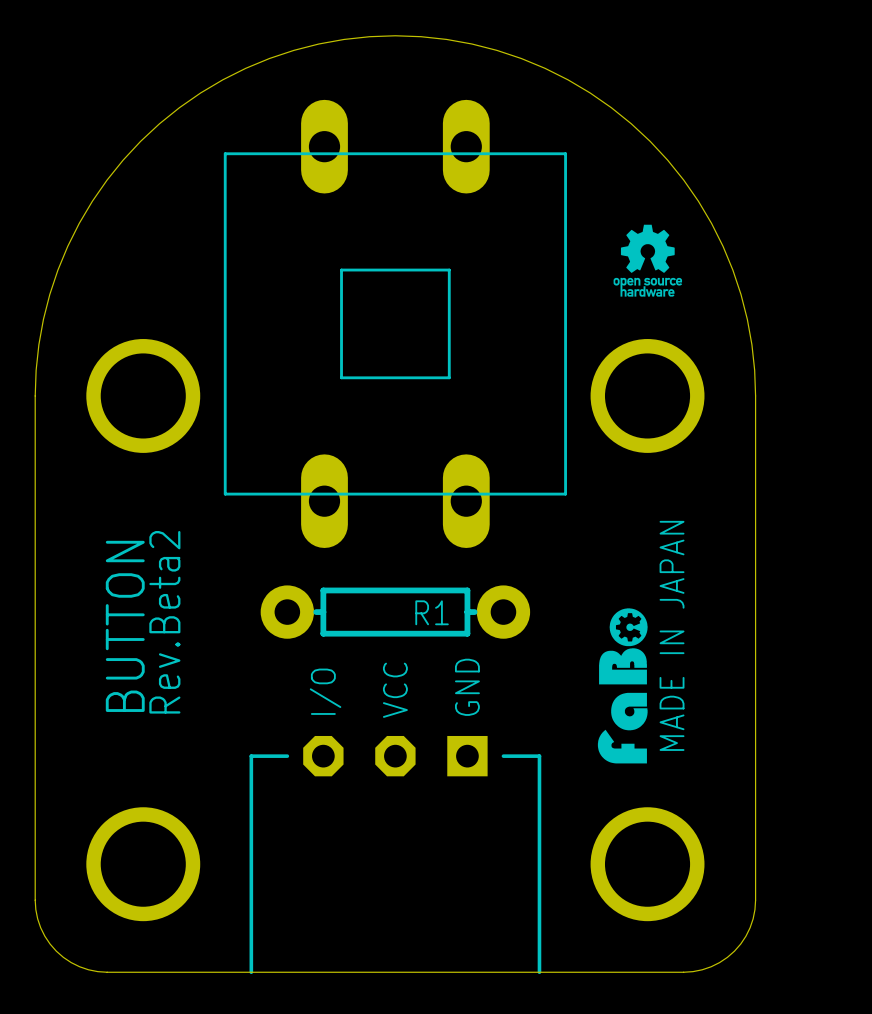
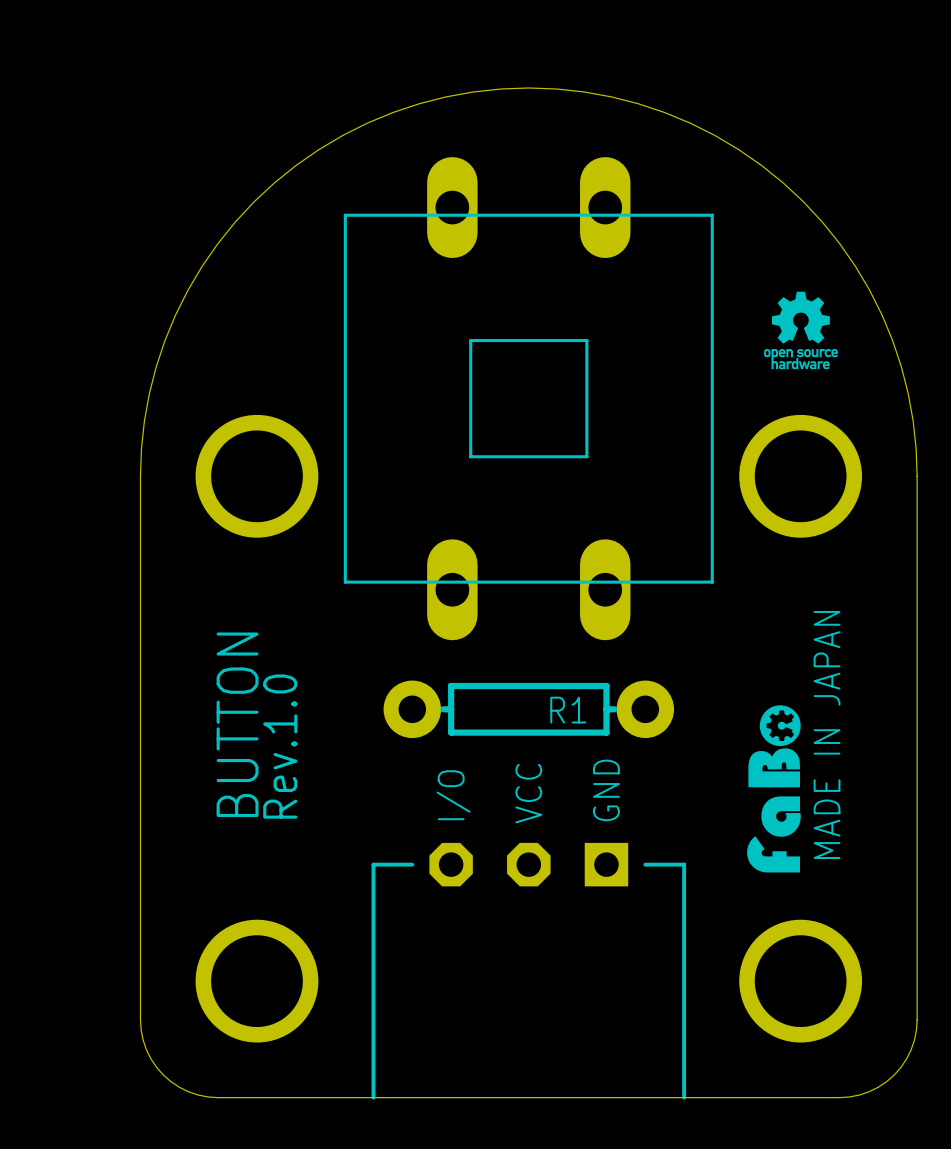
text: Rev.Beta2 (164, 622) -> Rev.1.0 (280, 746)

